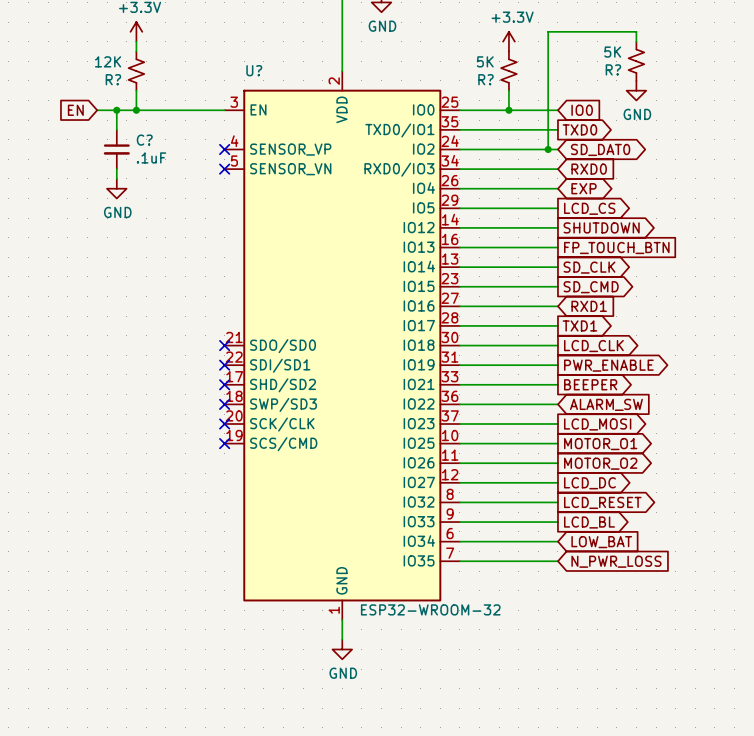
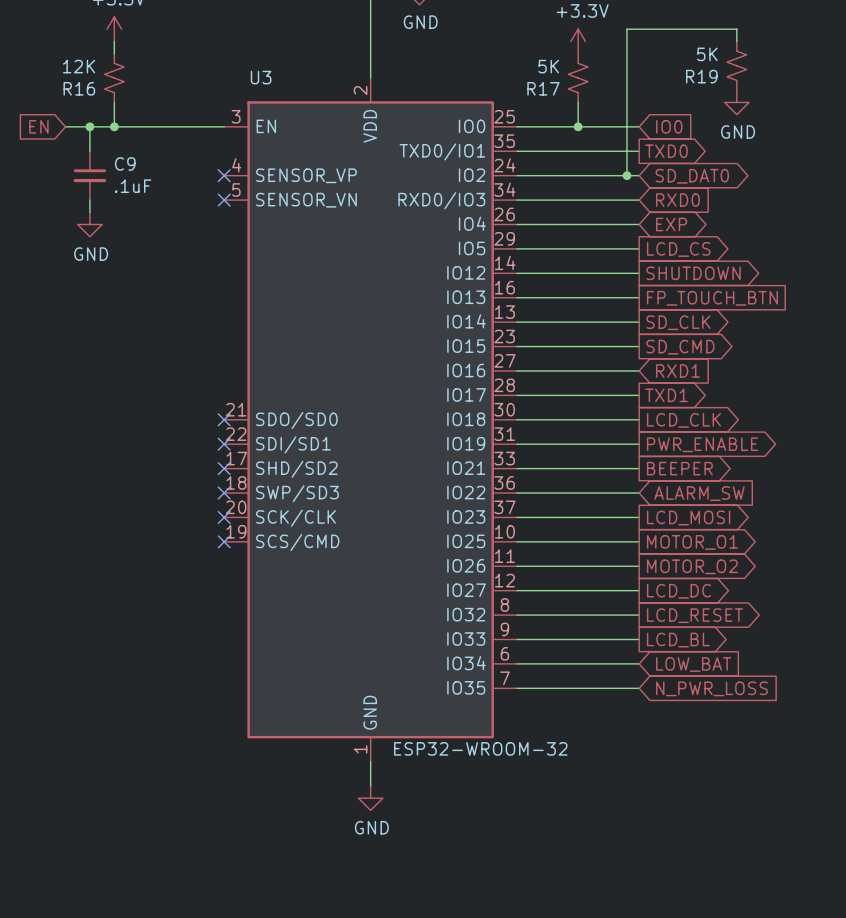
R? name: R? (613, 69) -> R19 (701, 76)
U? name: U? (254, 70) -> U3 (261, 77)
R? name: R? (113, 79) -> R16 (79, 88)
R? name: R? (485, 79) -> R17 (543, 88)
C? name: C? (144, 140) -> C9 (125, 163)

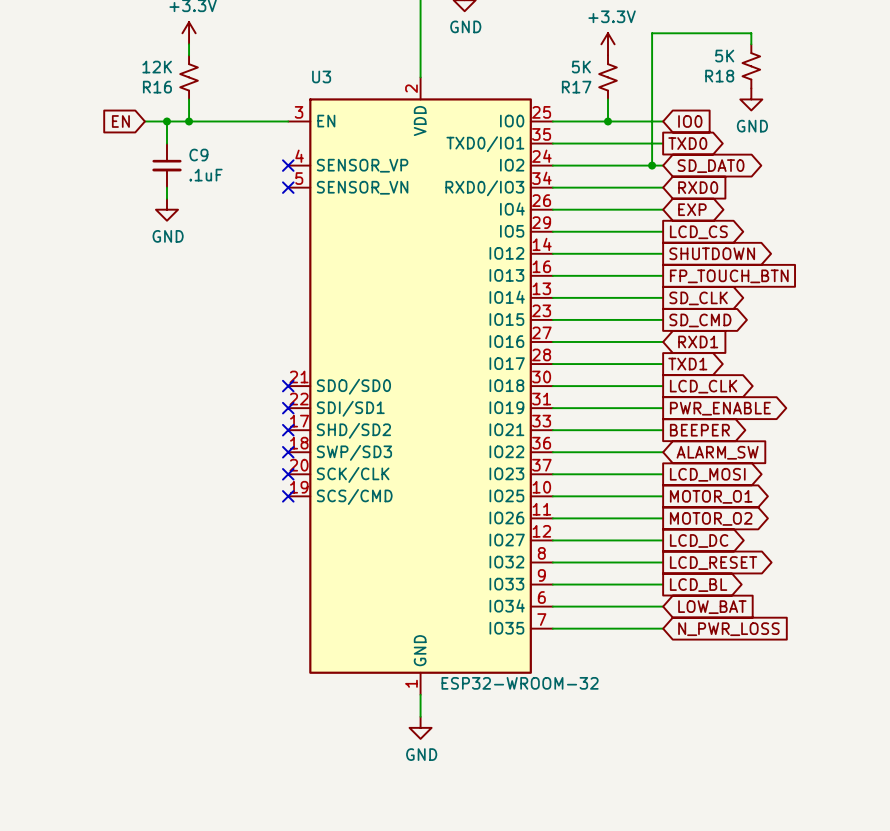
R19 name: R19 (701, 76) -> R18 (719, 76)

